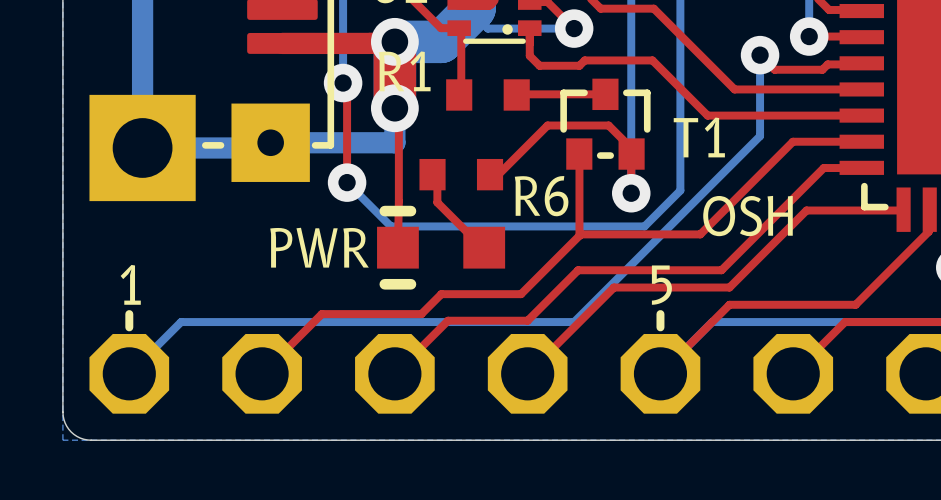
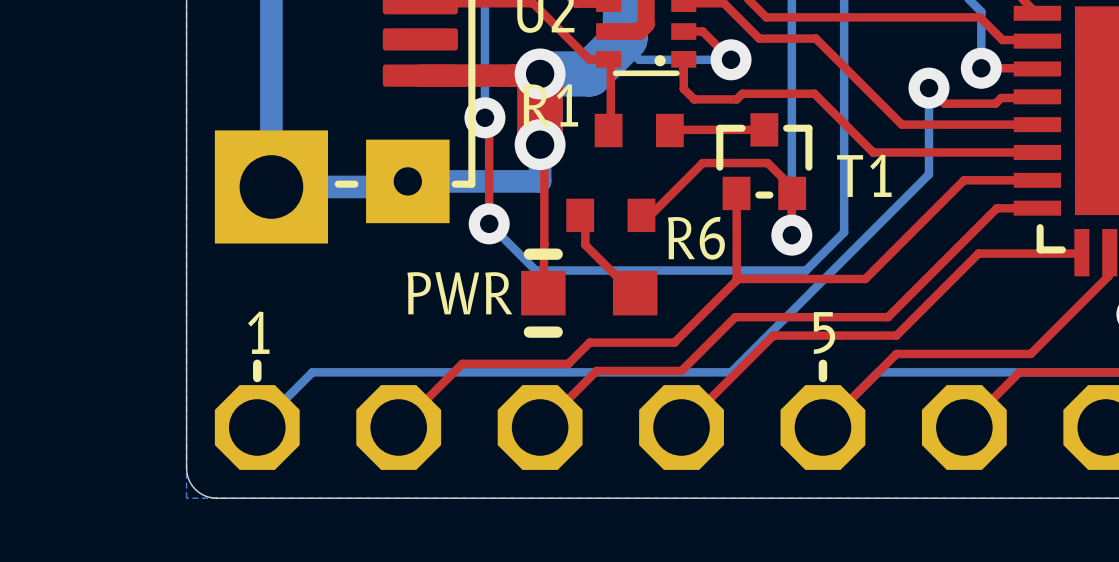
text: OSH (748, 216) -> none

